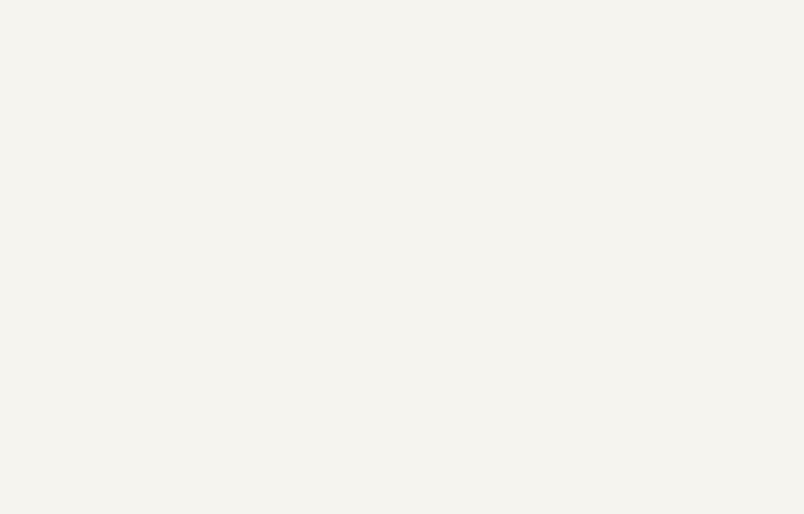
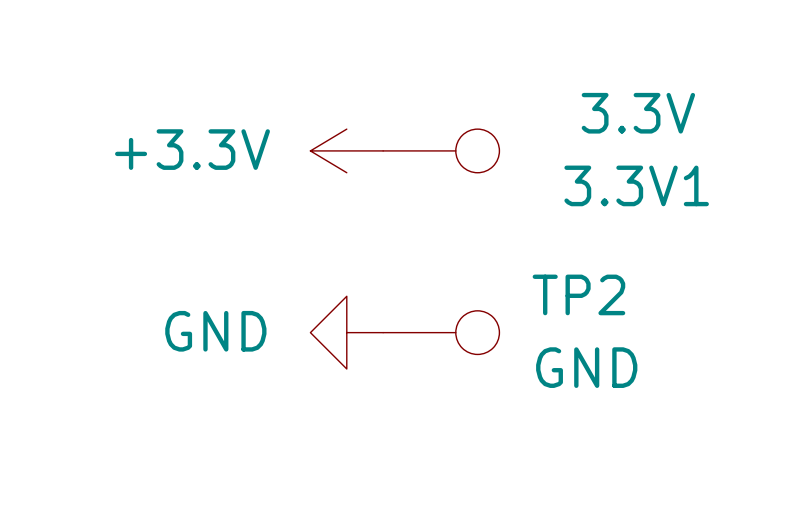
power symbol: none -> +3.3V (346, 150)
3.3V1: none -> 3.3V (441, 150)
power symbol: none -> GND (346, 332)
TP2: none -> GND (441, 332)

